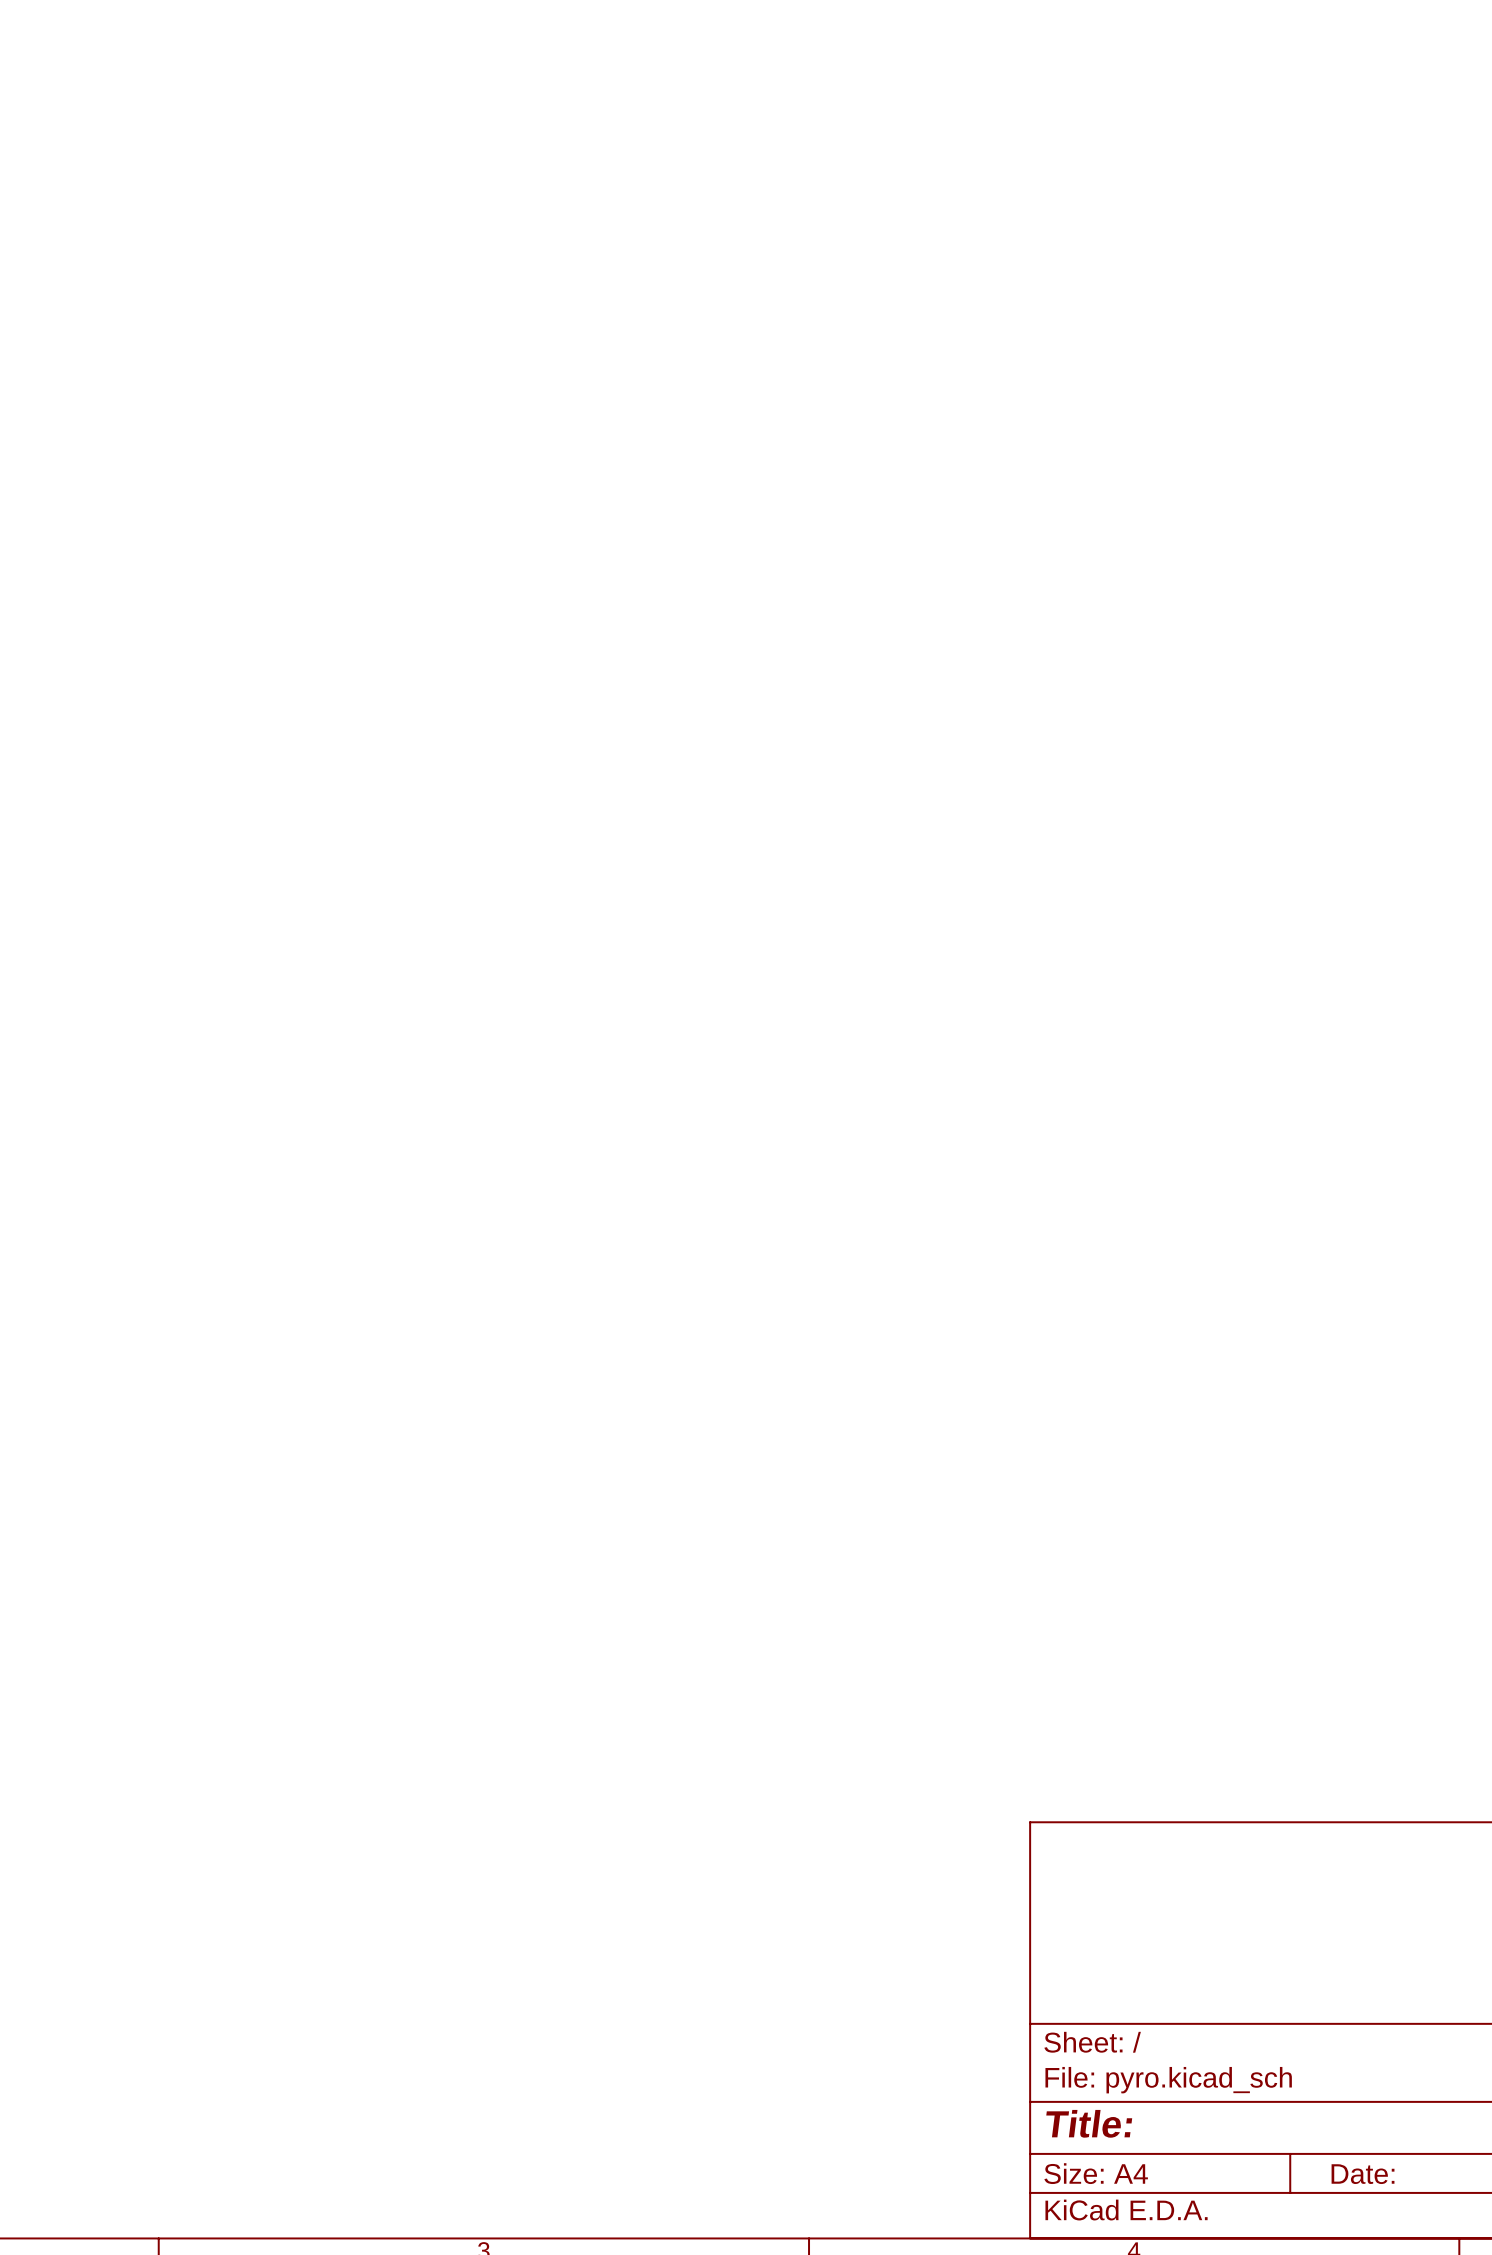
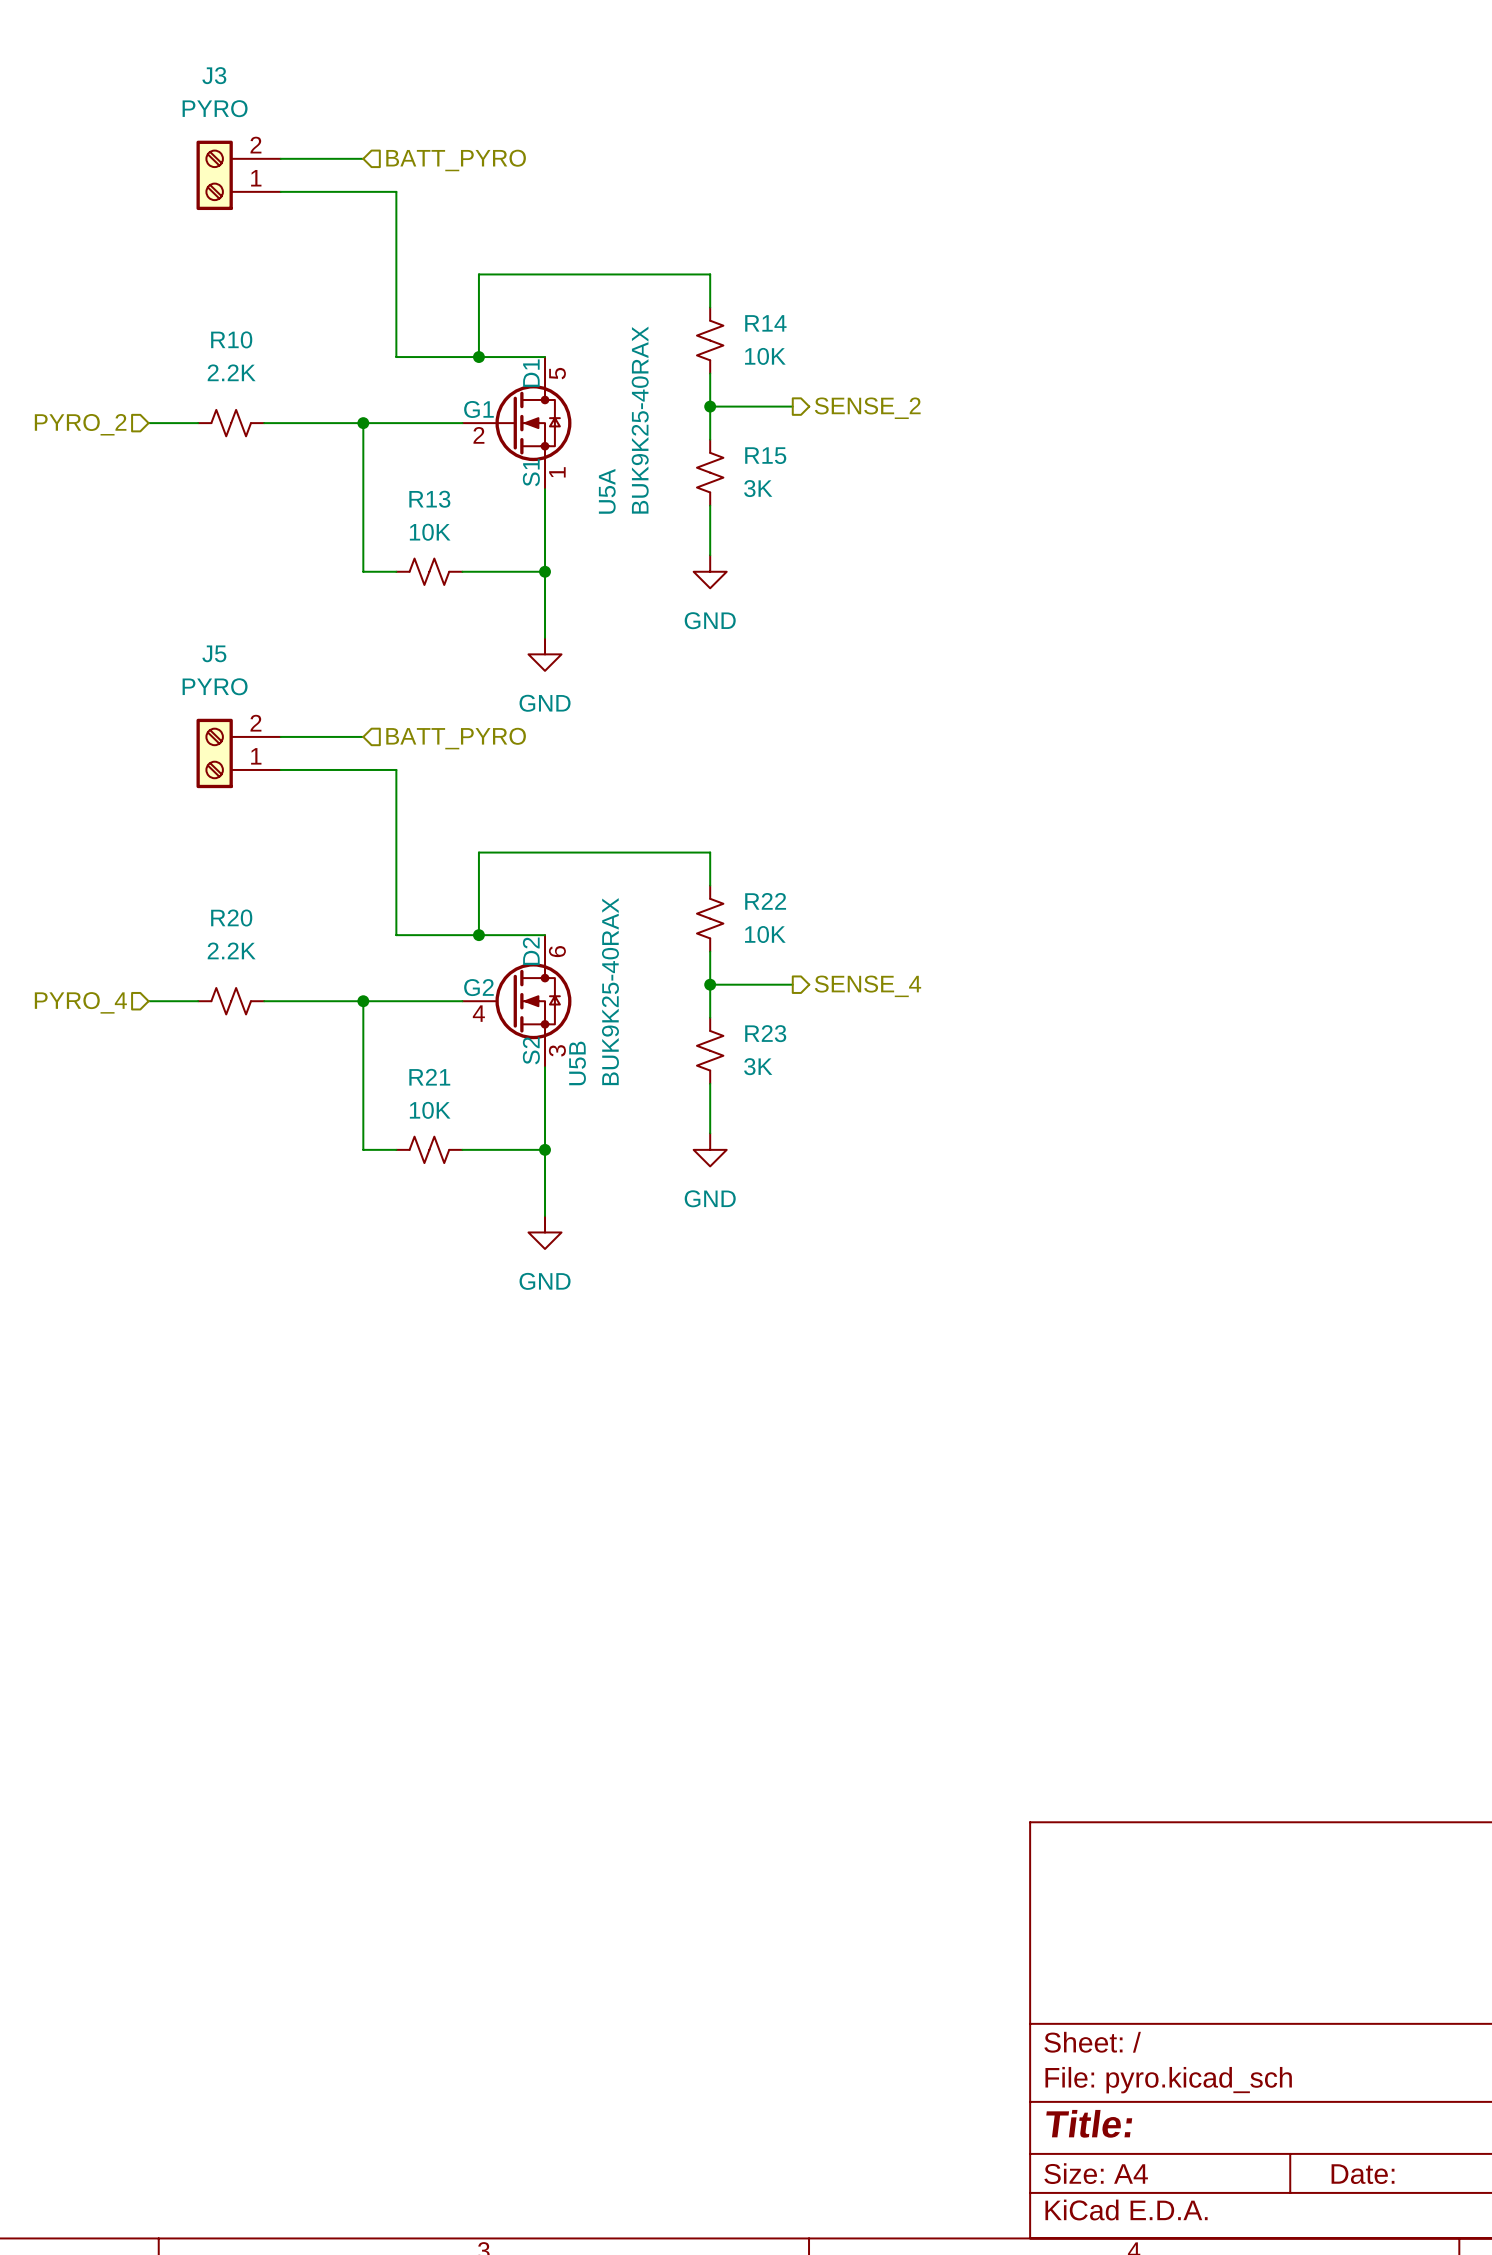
wire: none -> (280, 158) (363, 158)
hierarchical label: none -> BATT_PYRO (456, 160)
J3: none -> PYRO (238, 175)
wire: none -> (280, 191) (396, 191) (396, 357) (545, 357)
wire: none -> (710, 307) (710, 274) (478, 274) (478, 357)
R14: none -> 10K (710, 340)
junction: none -> (478, 357)
wire: none -> (710, 373) (710, 439)
wire: none -> (710, 406) (792, 406)
junction: none -> (710, 406)
hierarchical label: none -> SENSE_2 (867, 408)
wire: none -> (148, 423) (198, 423)
R10: none -> 2.2K (231, 423)
wire: none -> (264, 423) (462, 423)
wire: none -> (363, 423) (363, 571) (396, 571)
junction: none -> (363, 423)
U5A: none -> BUK9K25-40RAX (516, 423)
hierarchical label: none -> PYRO_2 (80, 424)
R15: none -> 3K (710, 472)
wire: none -> (545, 489) (545, 637)
wire: none -> (710, 505) (710, 555)
R13: none -> 10K (429, 571)
wire: none -> (462, 571) (545, 571)
junction: none -> (545, 571)
power symbol: none -> GND (710, 571)
power symbol: none -> GND (545, 654)
wire: none -> (280, 736) (363, 736)
hierarchical label: none -> BATT_PYRO (456, 738)
J5: none -> PYRO (238, 753)
wire: none -> (280, 769) (396, 769) (396, 935) (545, 935)
wire: none -> (710, 885) (710, 852) (478, 852) (478, 935)
R22: none -> 10K (710, 918)
junction: none -> (478, 935)
wire: none -> (710, 951) (710, 1017)
wire: none -> (710, 984) (792, 984)
junction: none -> (710, 984)
hierarchical label: none -> SENSE_4 (867, 986)
wire: none -> (148, 1001) (198, 1001)
R20: none -> 2.2K (231, 1001)
wire: none -> (264, 1001) (462, 1001)
wire: none -> (363, 1001) (363, 1149) (396, 1149)
junction: none -> (363, 1001)
U5B: none -> BUK9K25-40RAX (516, 1001)
hierarchical label: none -> PYRO_4 (80, 1002)
R23: none -> 3K (710, 1050)
wire: none -> (545, 1067) (545, 1215)
wire: none -> (710, 1083) (710, 1133)
R21: none -> 10K (429, 1149)
wire: none -> (462, 1149) (545, 1149)
junction: none -> (545, 1149)
power symbol: none -> GND (710, 1149)
power symbol: none -> GND (545, 1232)

